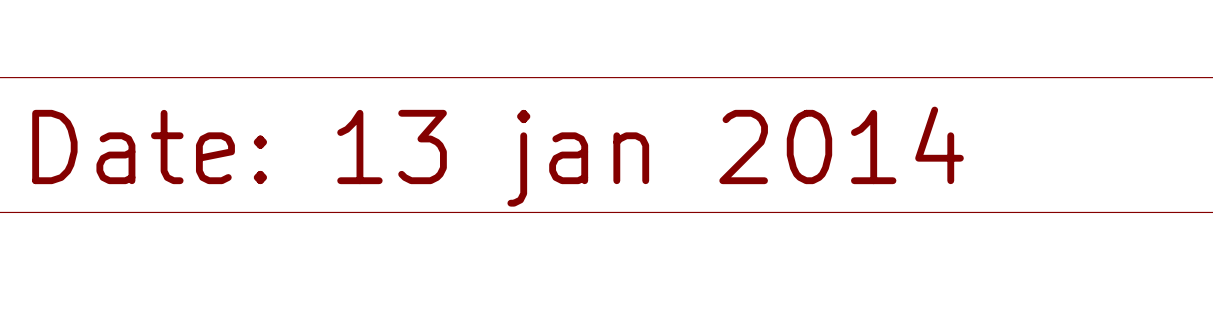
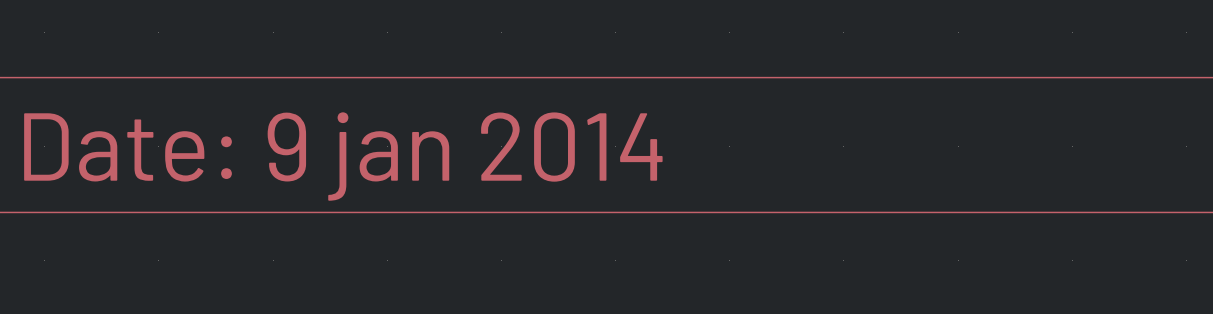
title block: Date: 13 jan 2014 (498, 156) -> Date: 9 jan 2014 (343, 156)

